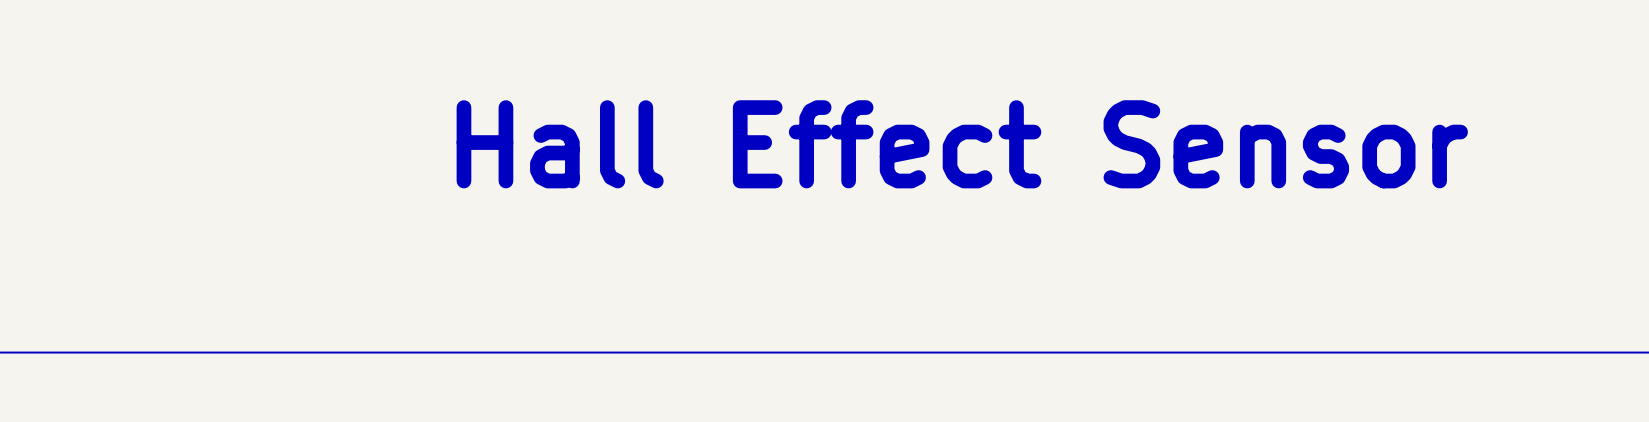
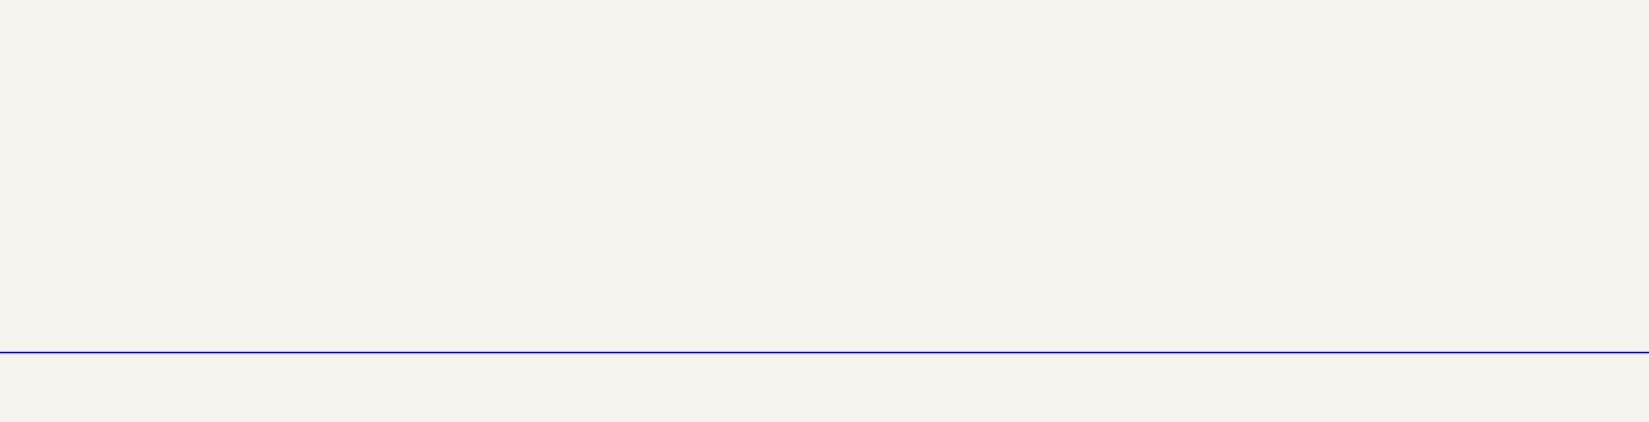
text: Hall Effect Sensor (962, 144) -> none

